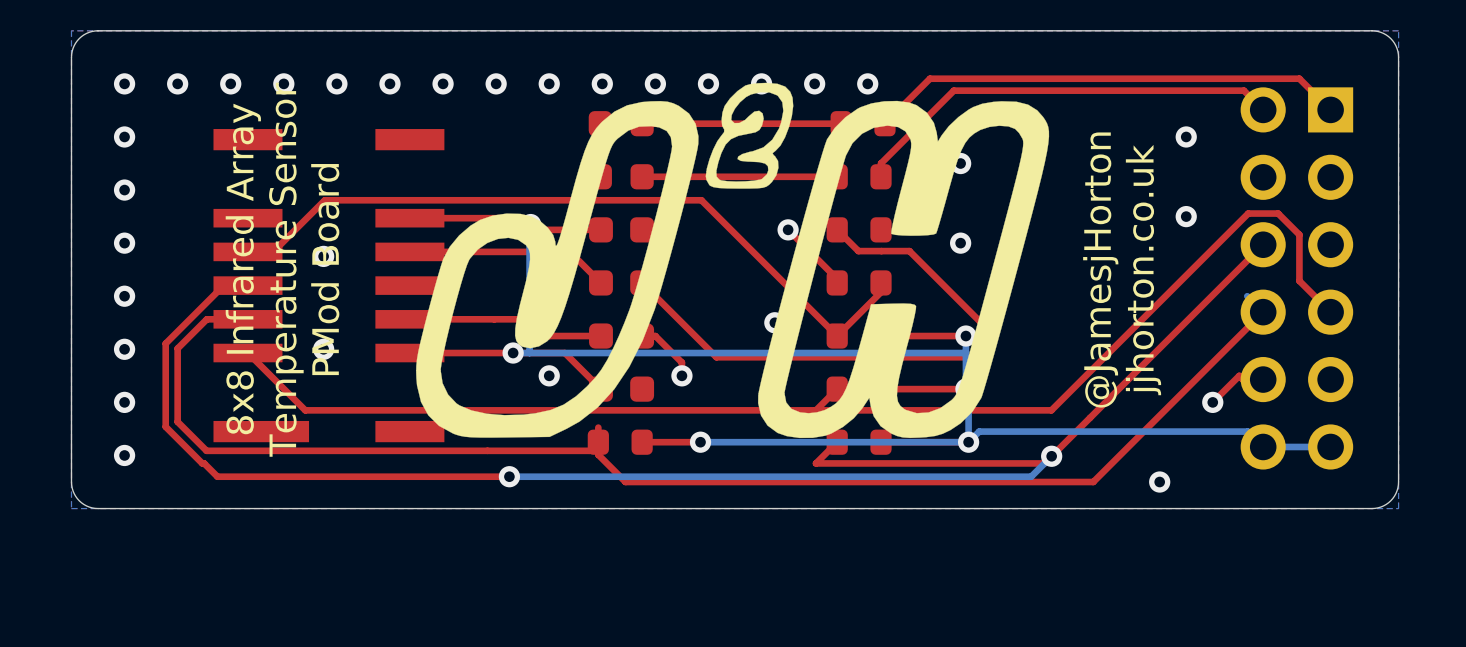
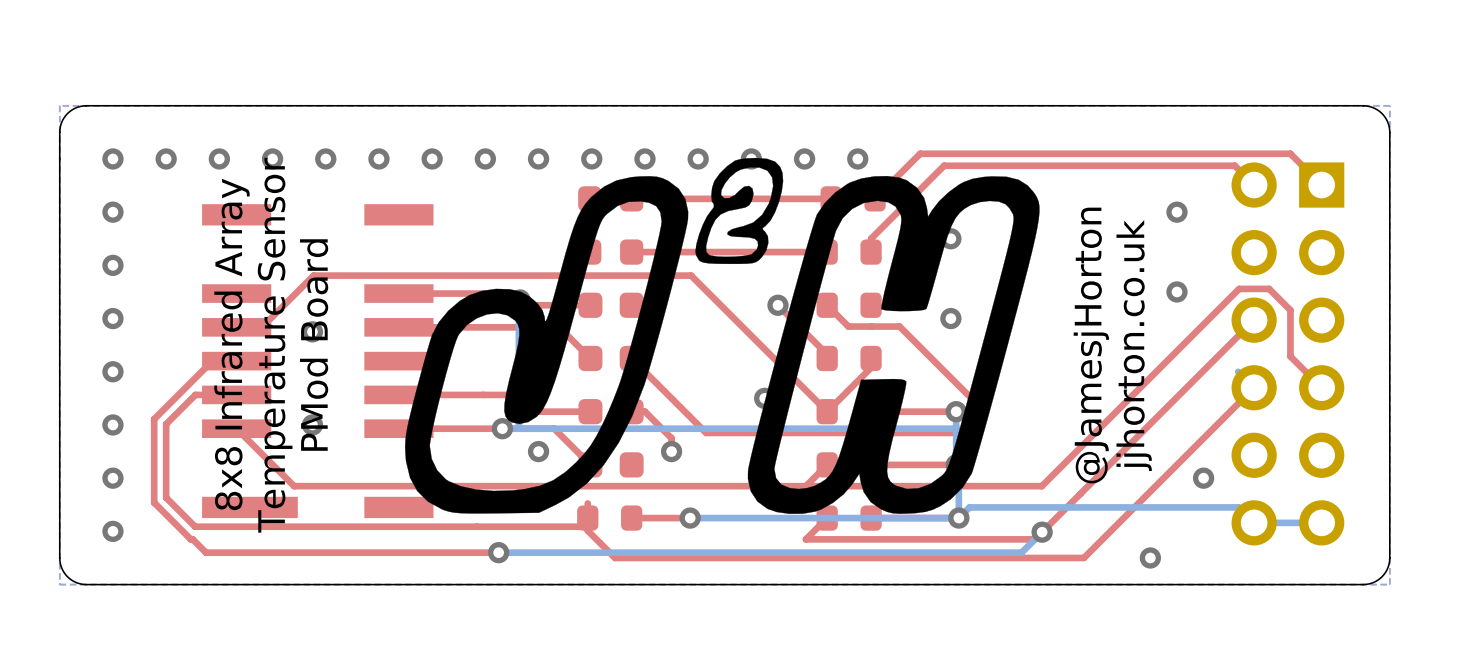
top track: (1263, 379) (1243, 379) (1239, 375) (1212, 402) -> none

